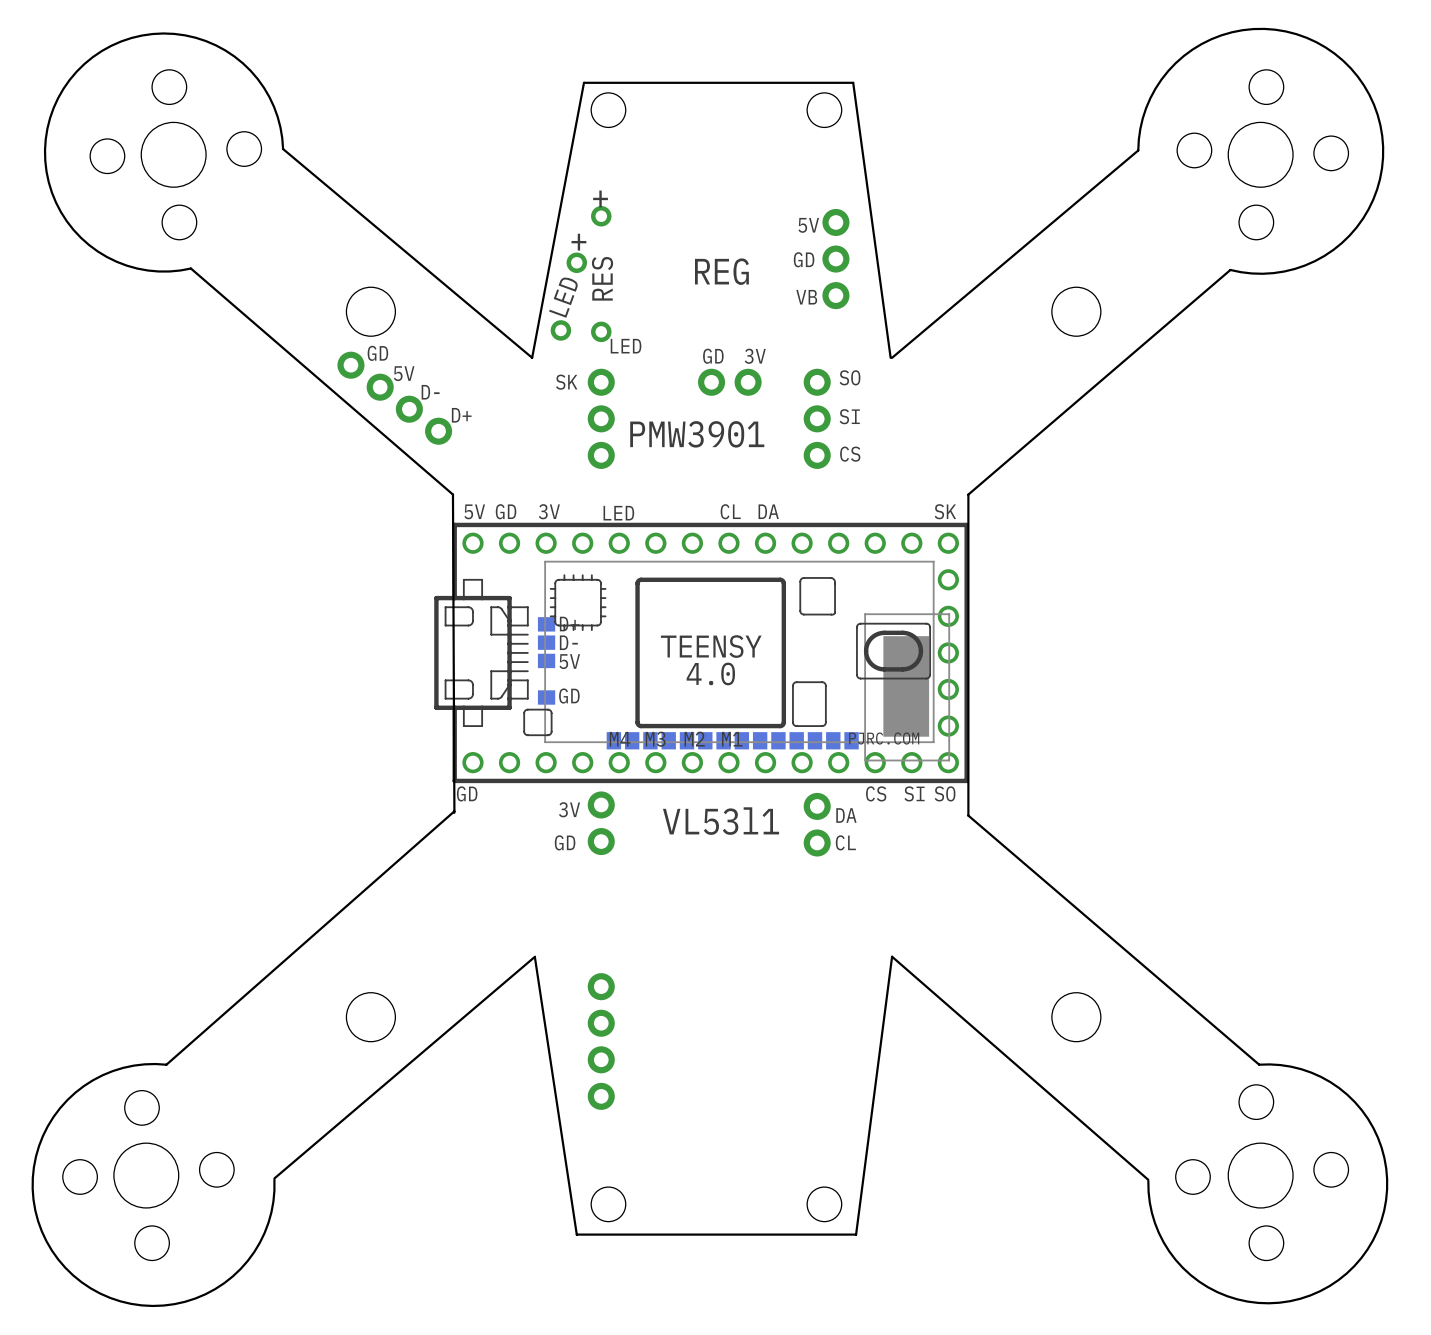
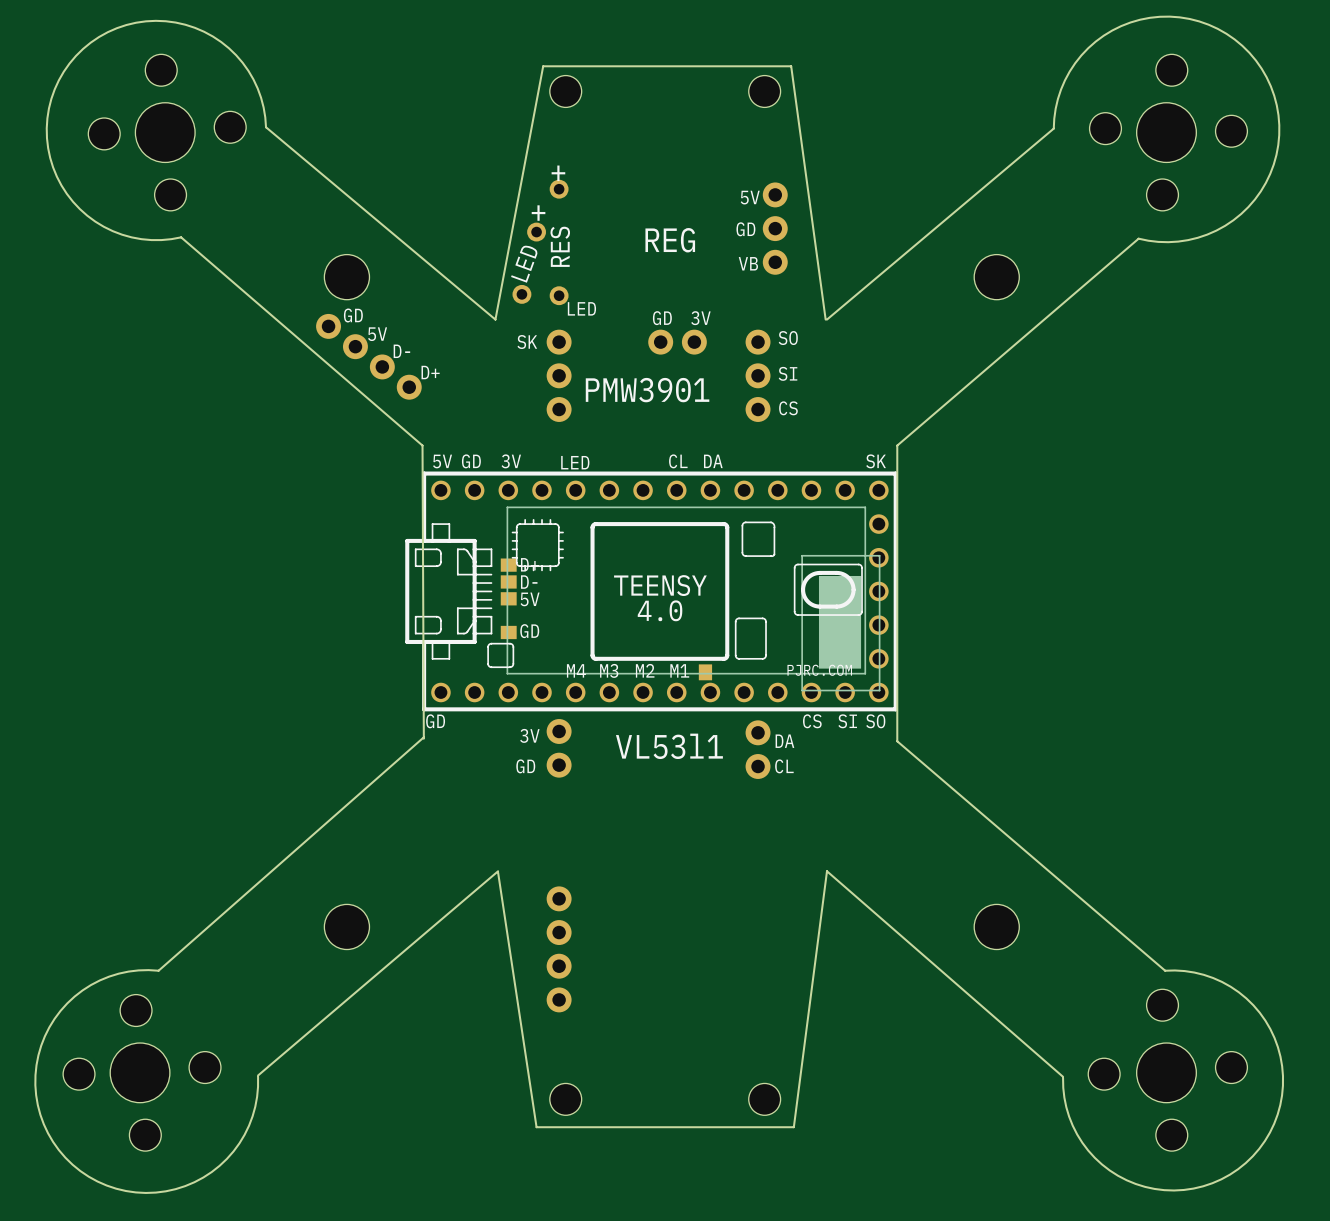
part footprint: [537, 560, 951, 762] -> [500, 506, 881, 692]

